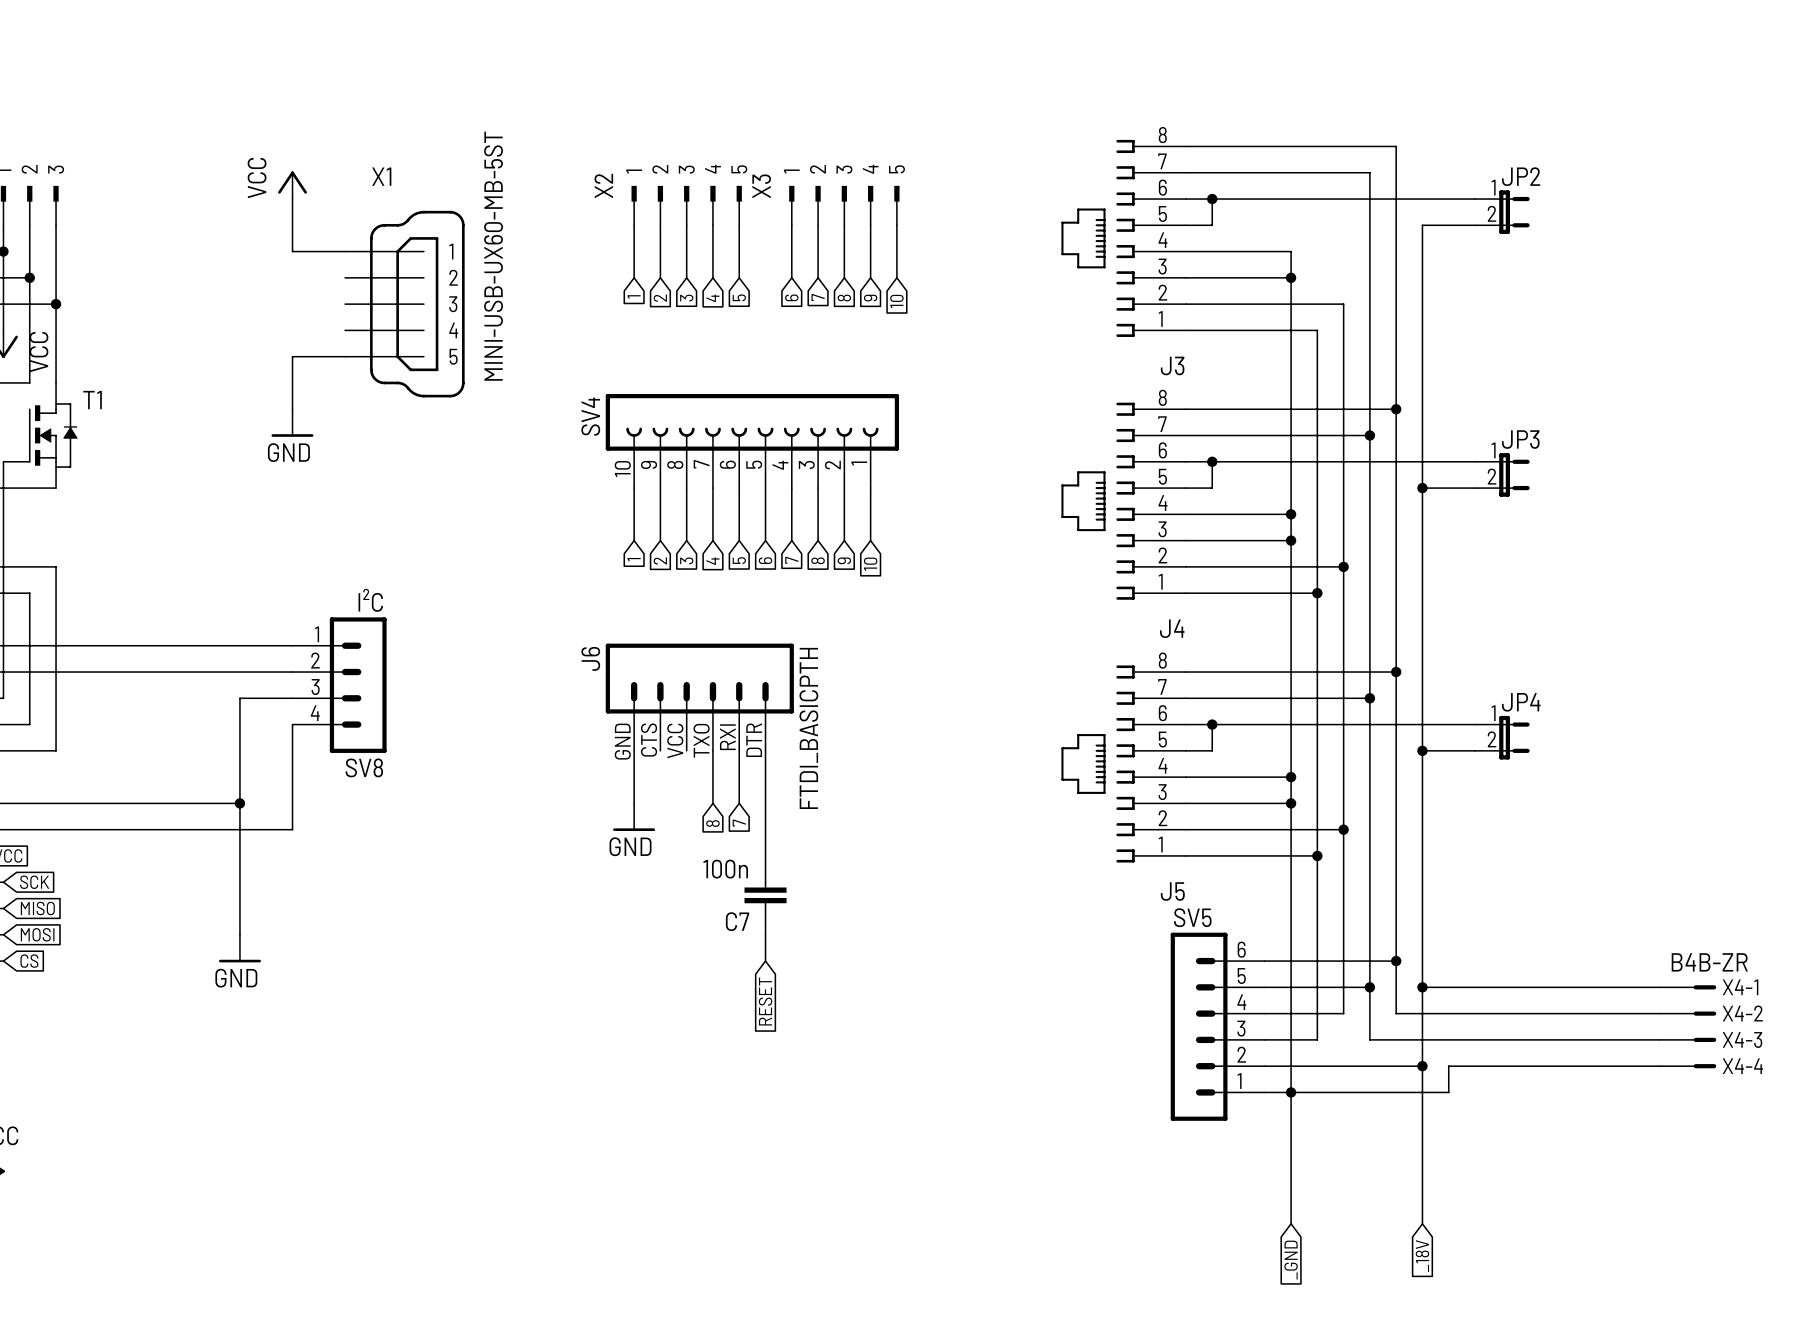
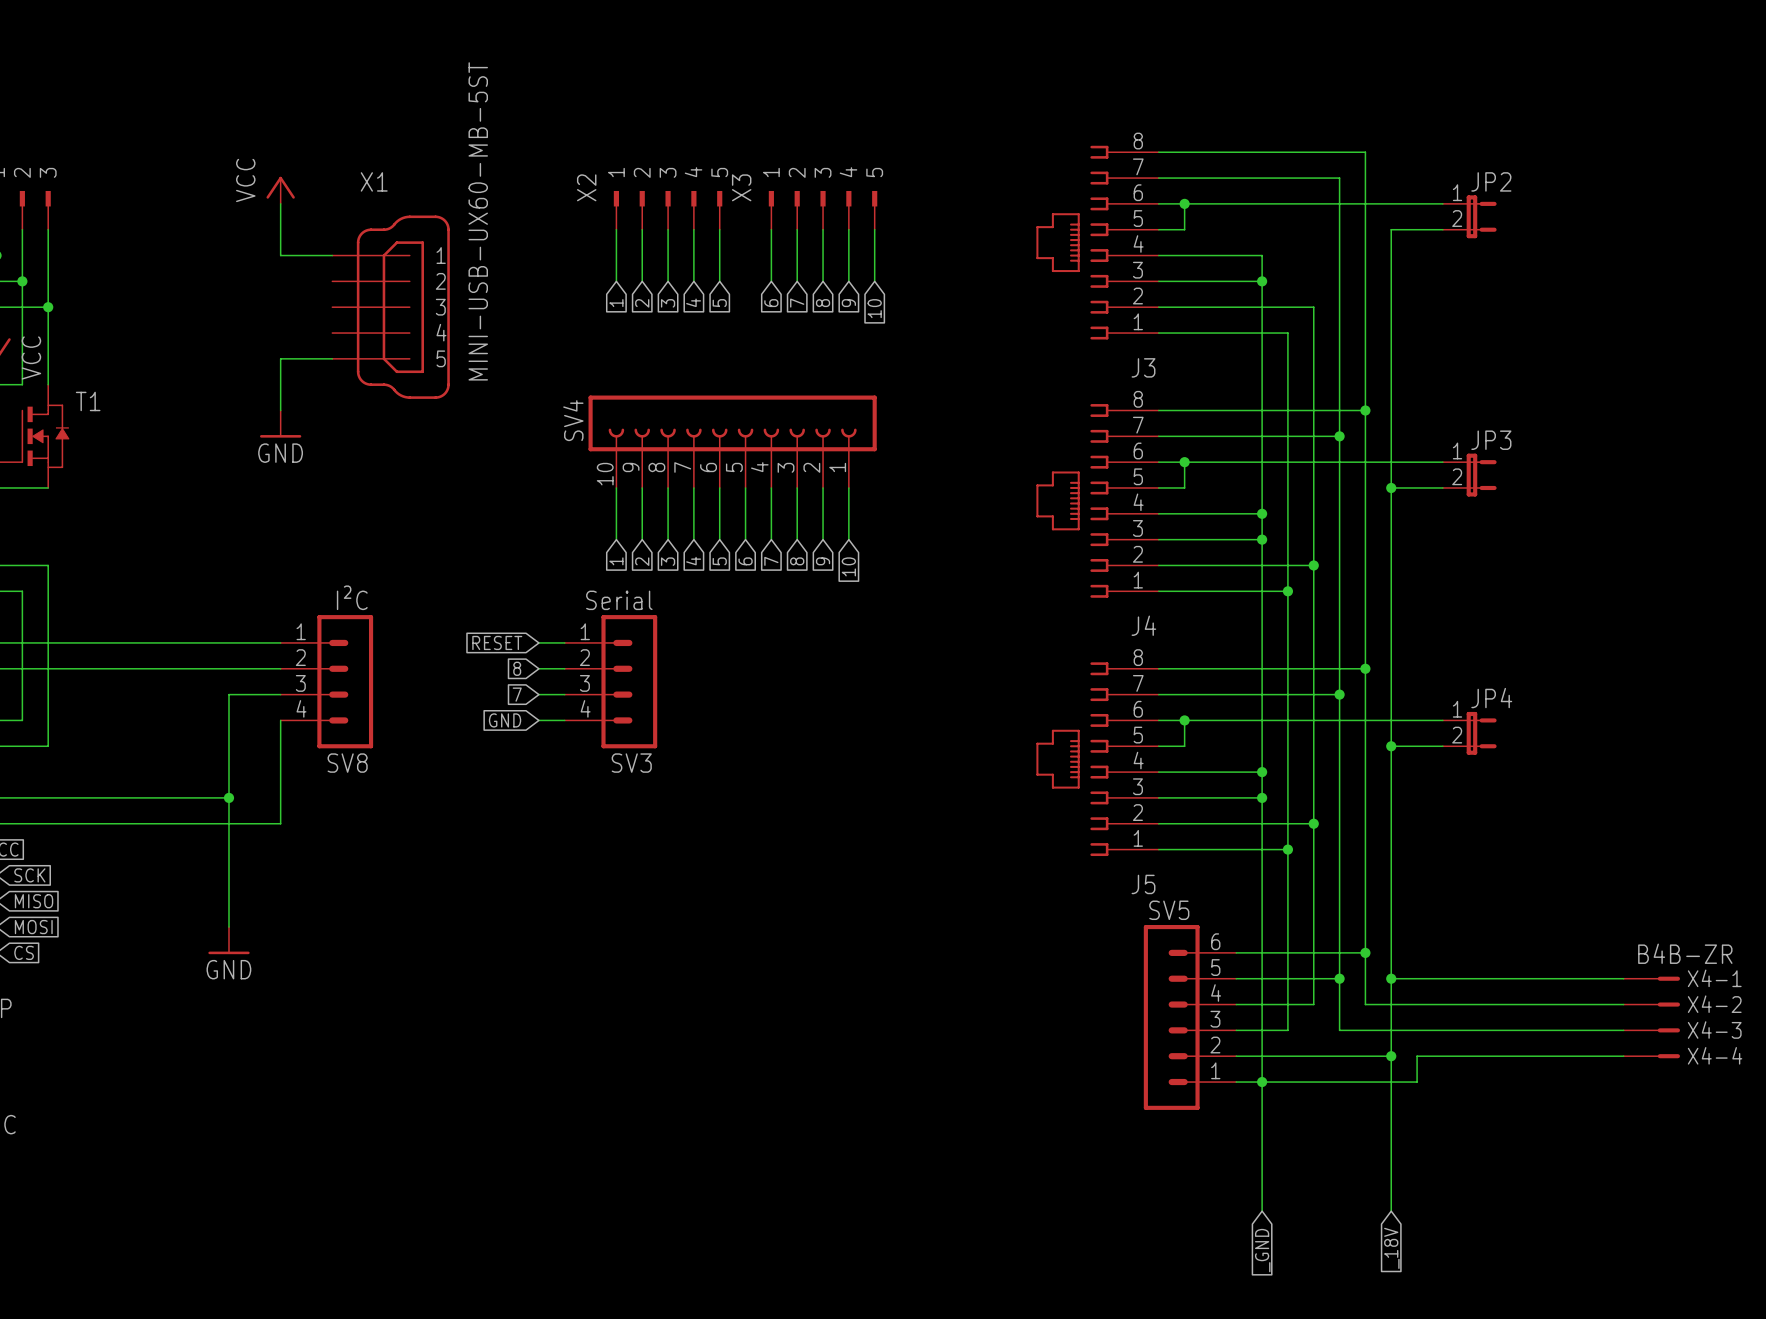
global label: none -> RESET (497, 642)
wire: none -> (538, 642) (564, 642)
wire: none -> (538, 668) (564, 668)
SV3: none -> Serial (610, 681)
J6: FTDI_BASICPTH (699, 697) -> none
wire: none -> (538, 694) (564, 694)
global label: none -> GND (505, 720)
wire: none -> (538, 720) (564, 720)
wire: (634, 750) (634, 803) -> none
wire: (712, 750) (712, 803) -> none
wire: (739, 750) (739, 803) -> none
wire: (765, 750) (765, 855) -> none
power symbol: GND (634, 817) -> none
global label rotation: 0° (712, 823) -> 90° clockwise (517, 668)
global label position: 8 (712, 823) -> 8 (517, 668)
global label rotation: 0° (739, 823) -> 90° clockwise (517, 694)
global label position: 7 (739, 823) -> 7 (517, 694)
C7: 100n (765, 895) -> none
wire: (765, 934) (765, 961) -> none
global label: RESET (765, 1001) -> none

